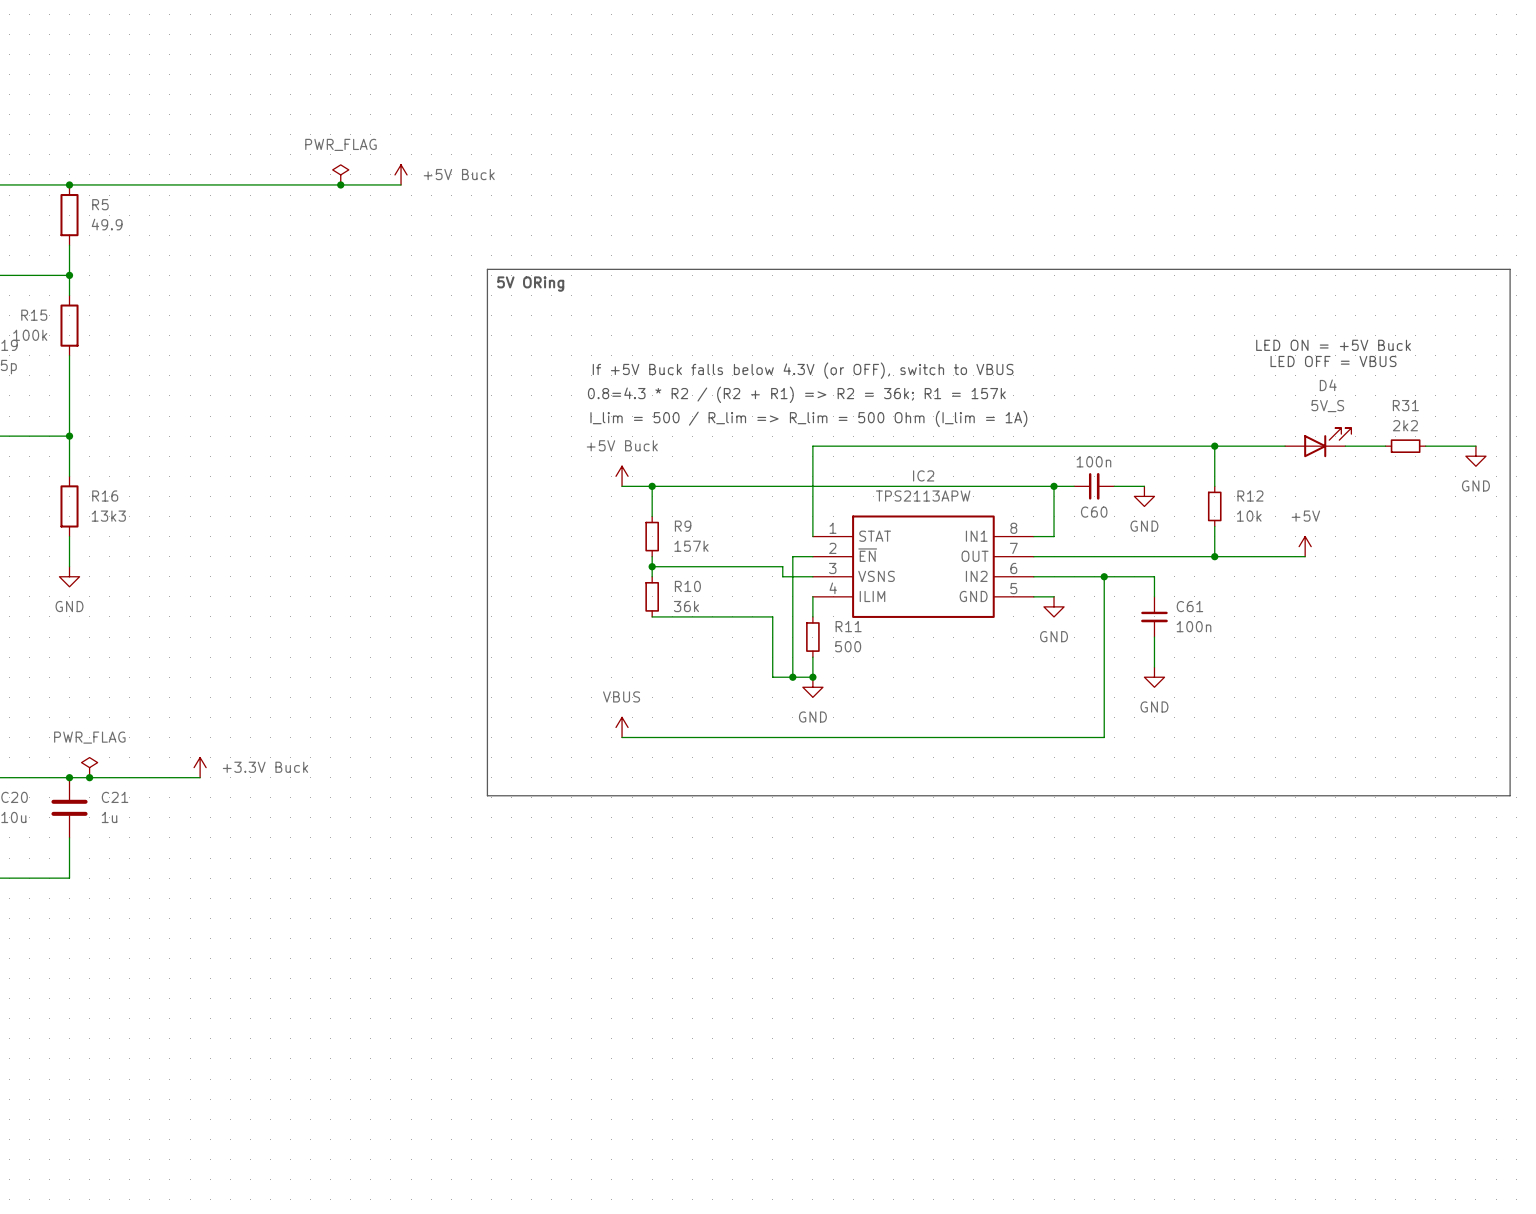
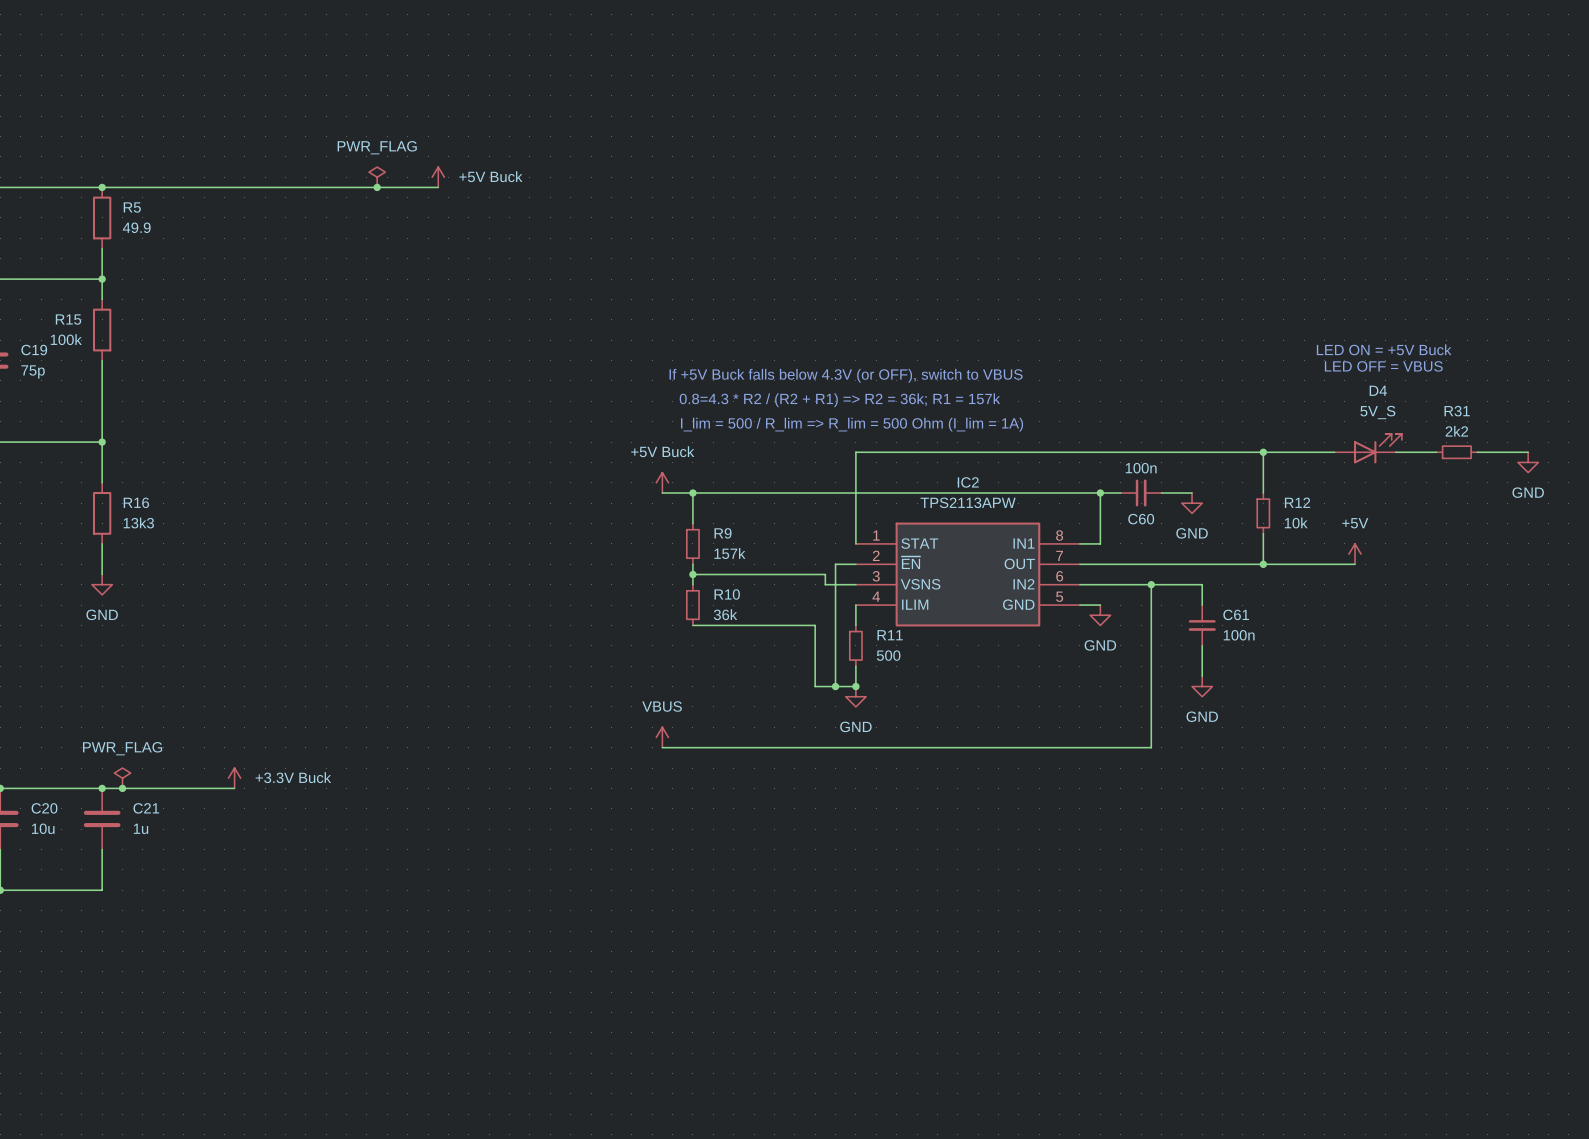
line: (487, 269) (1510, 269) (1510, 795) (487, 795) (487, 269) -> none
text: 5V ORing (530, 284) -> none

